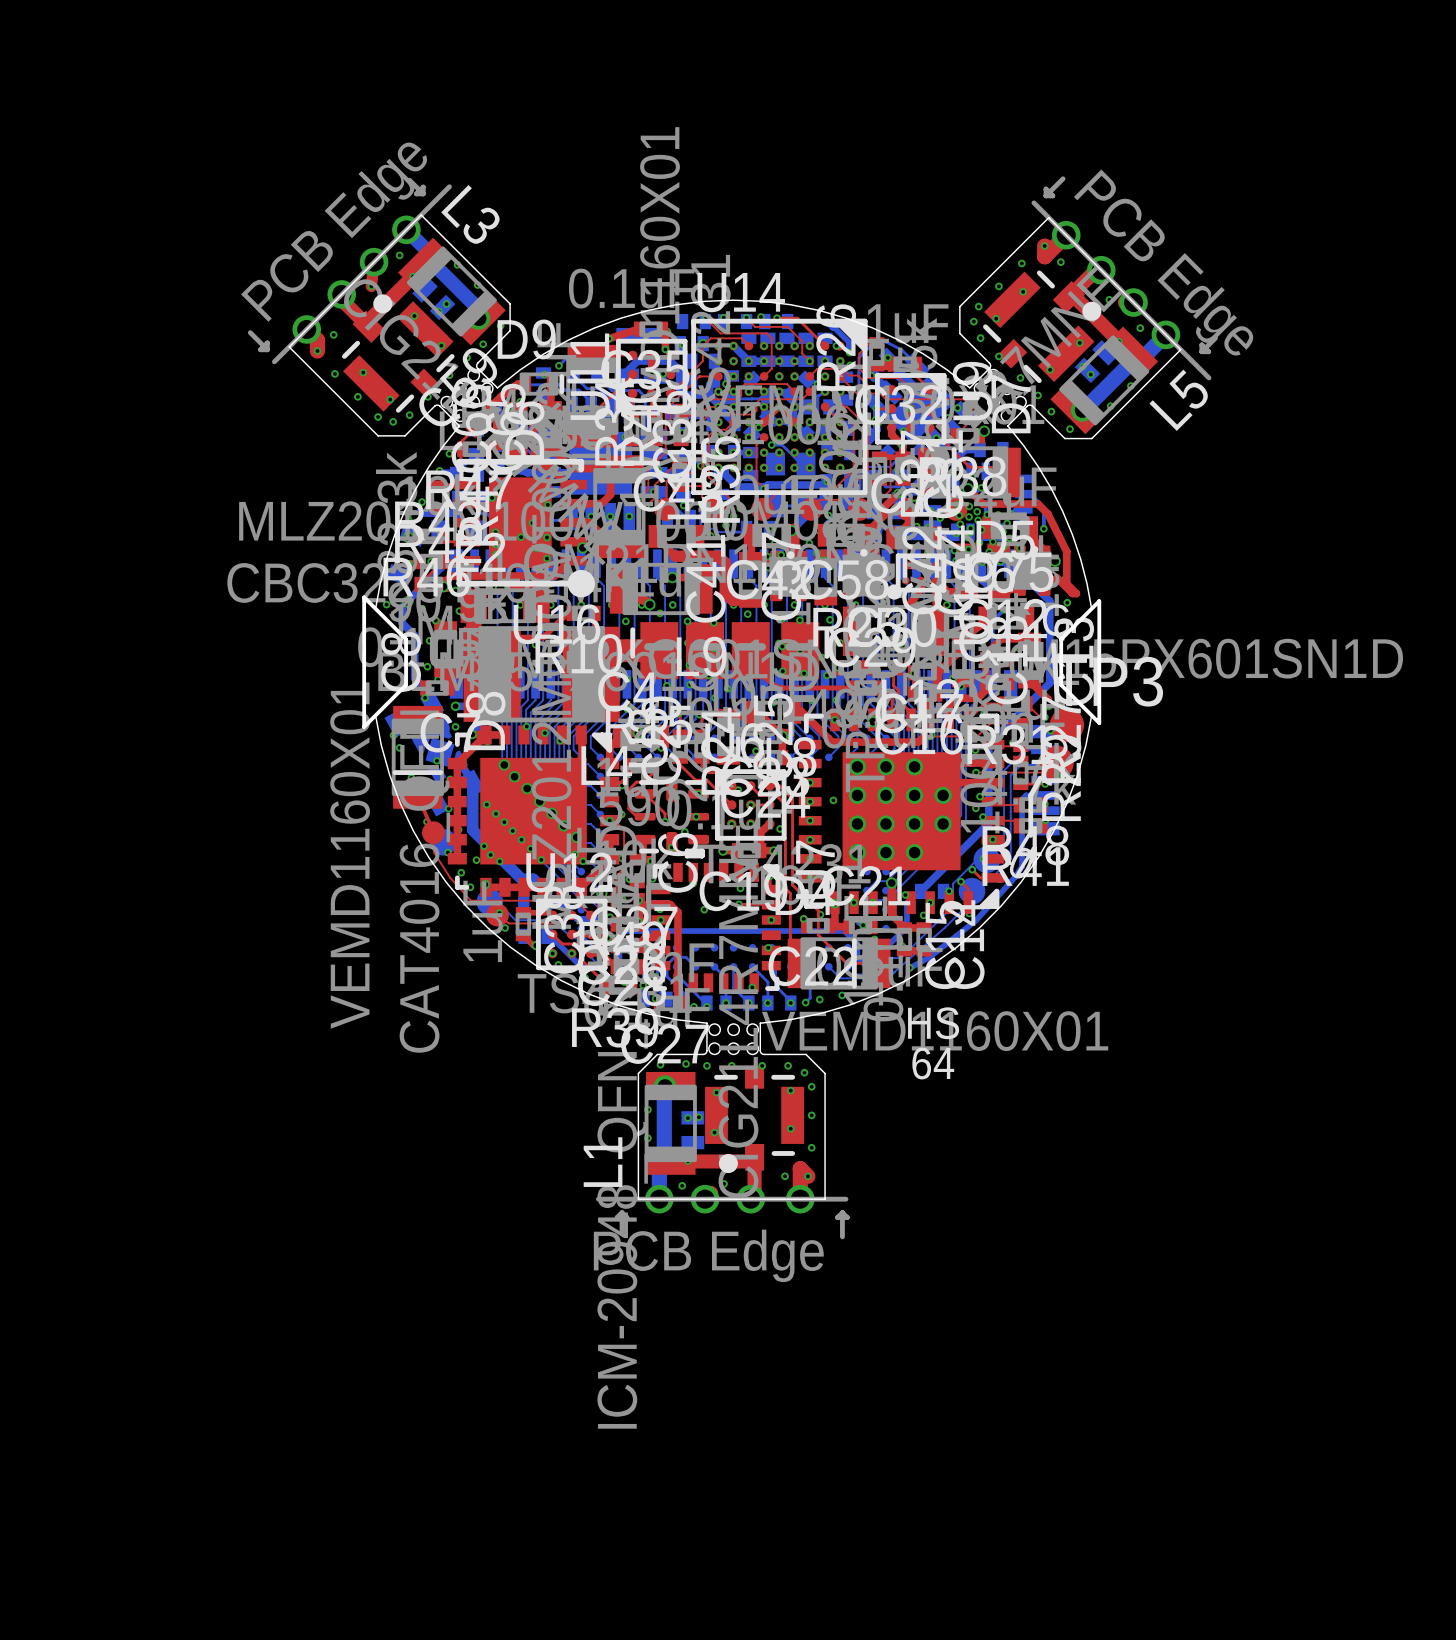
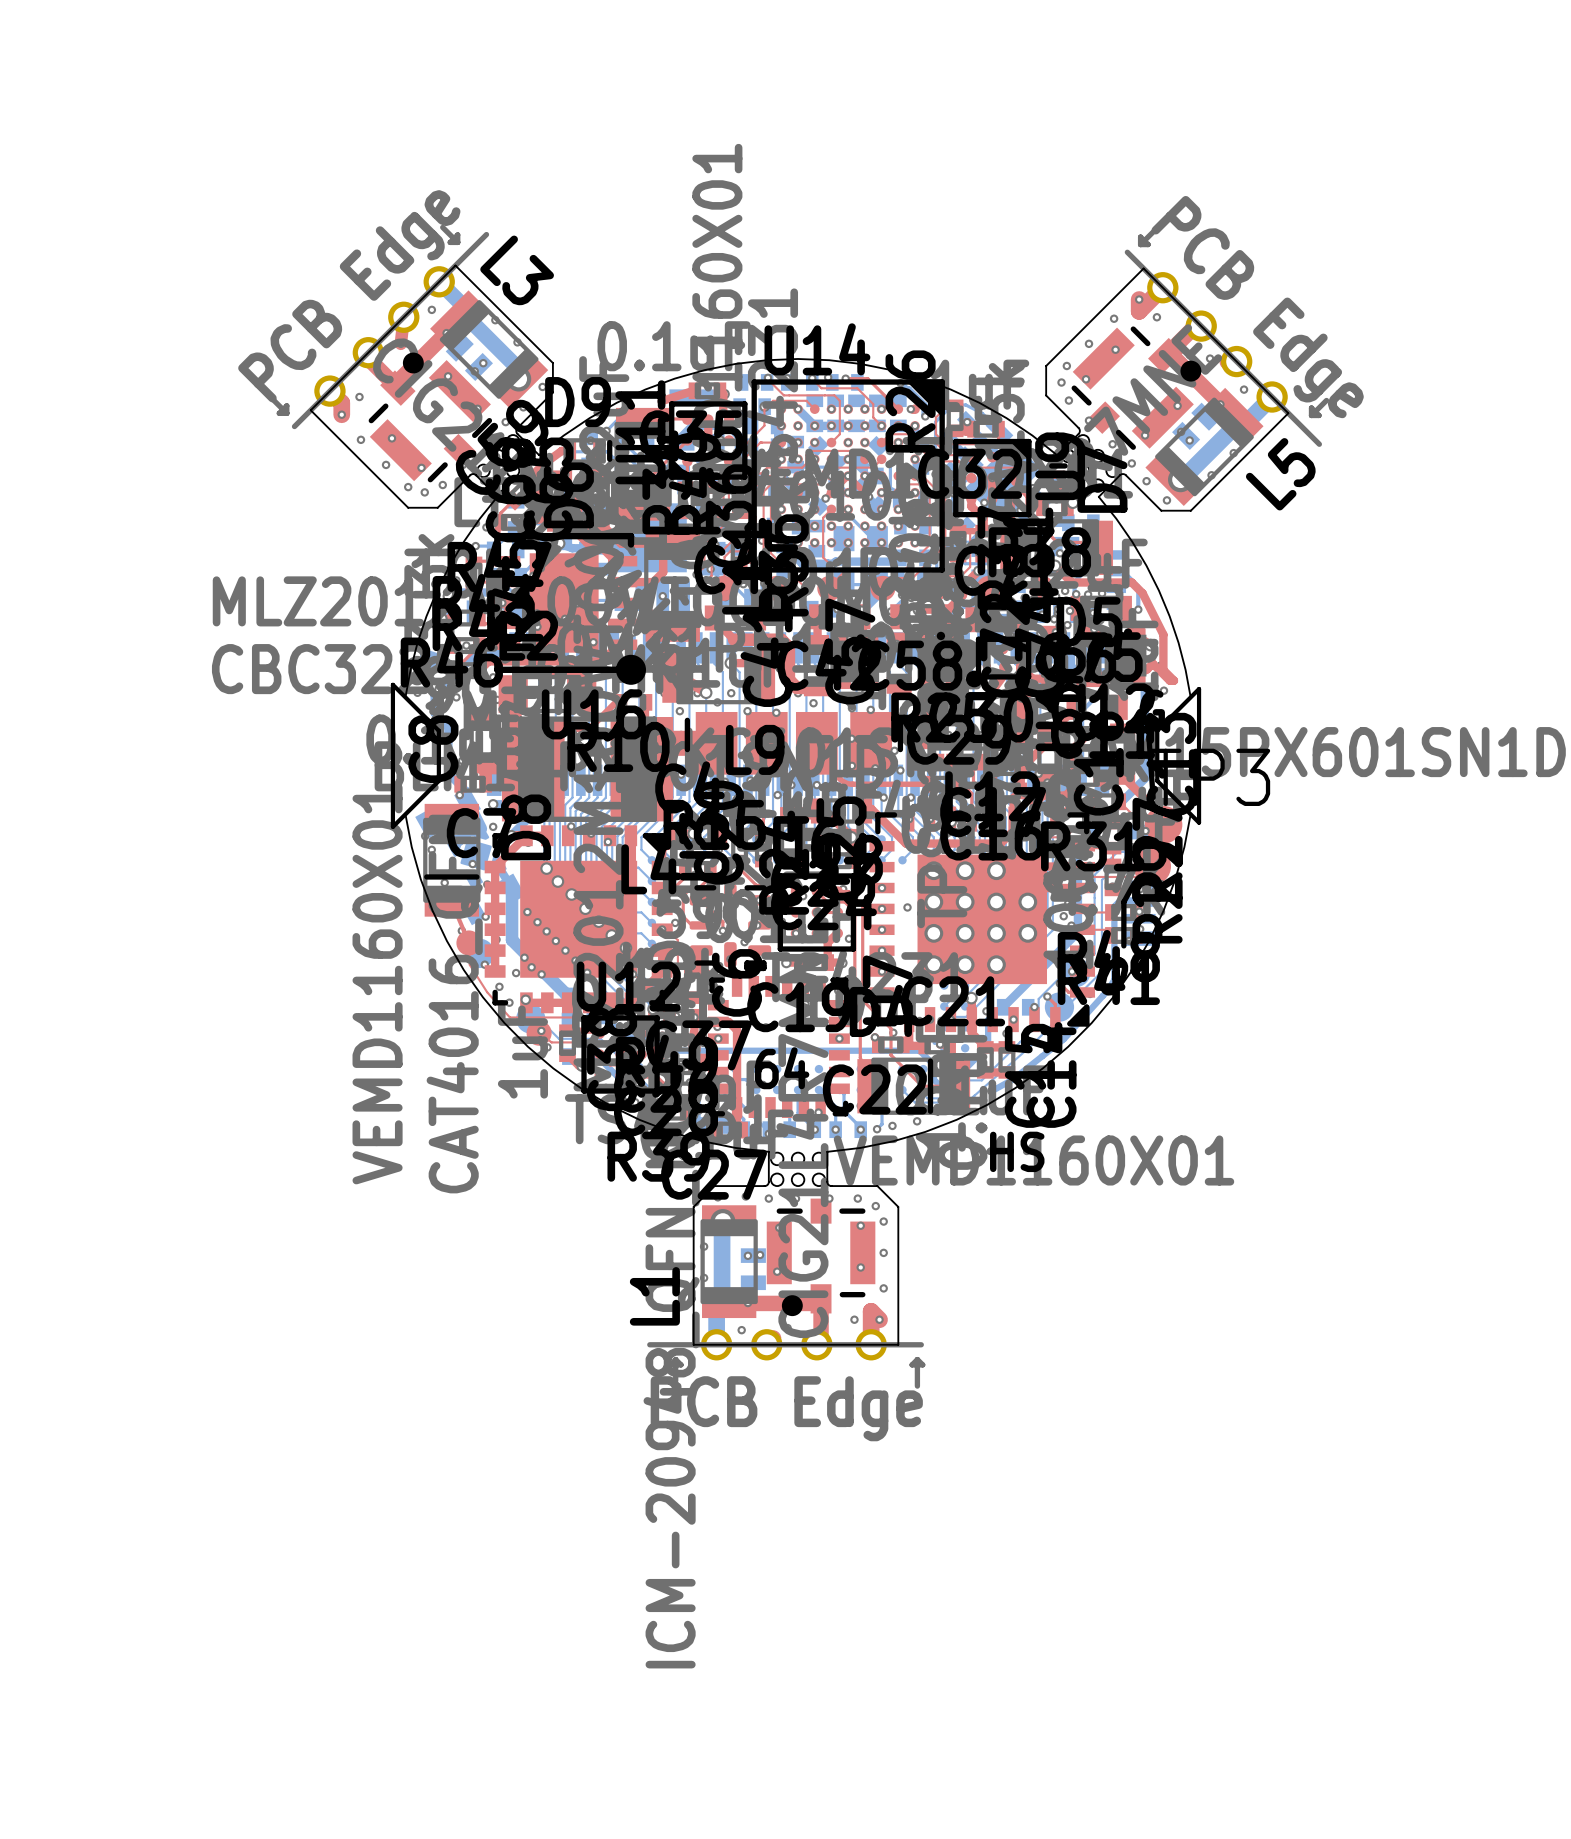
text position: 64 (933, 1063) -> 64 (782, 1068)

